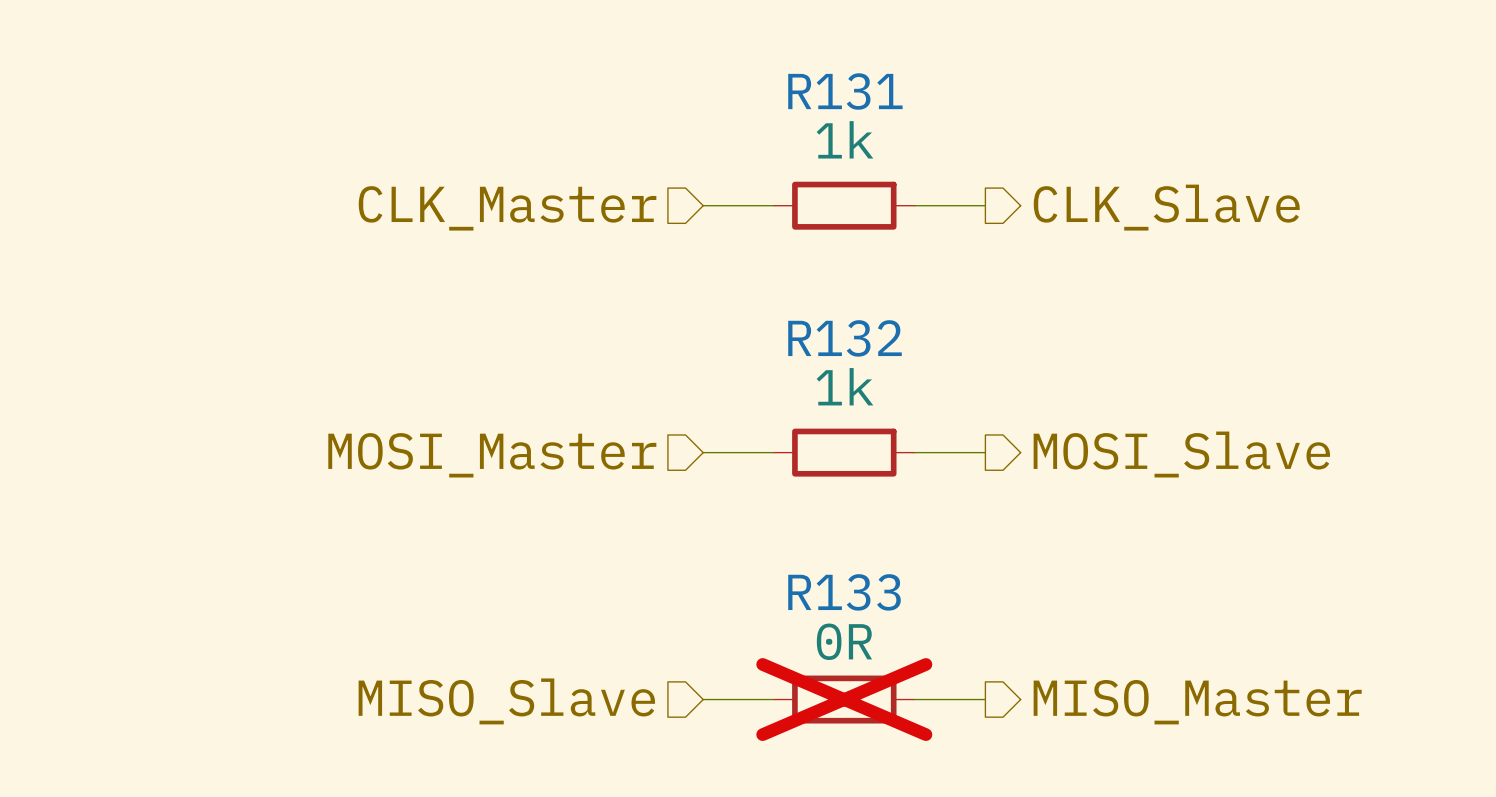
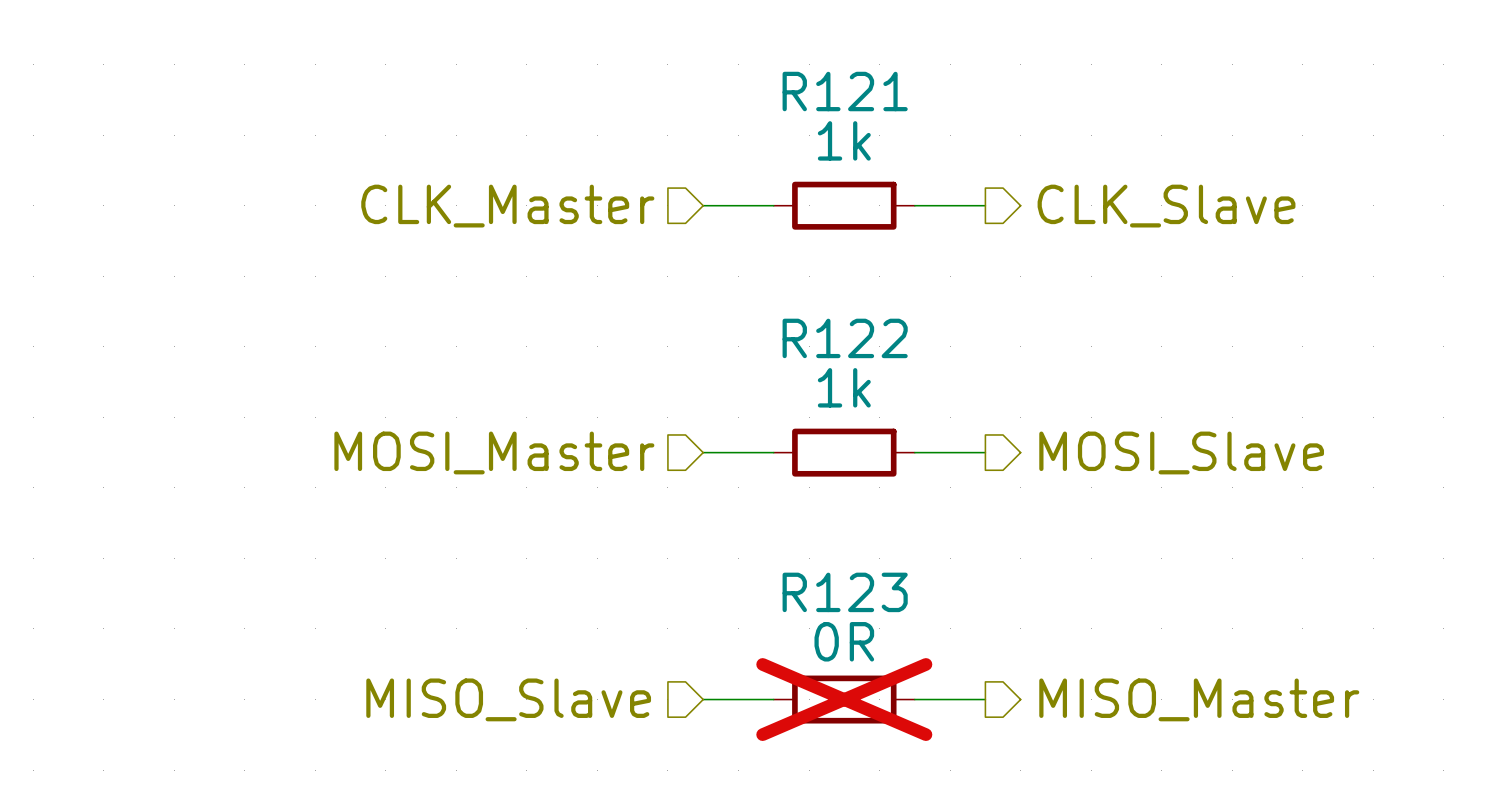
R131 name: R131 (845, 91) -> R121 (845, 91)
R132 name: R132 (844, 338) -> R122 (845, 338)
R133 name: R133 (844, 592) -> R123 (845, 592)

